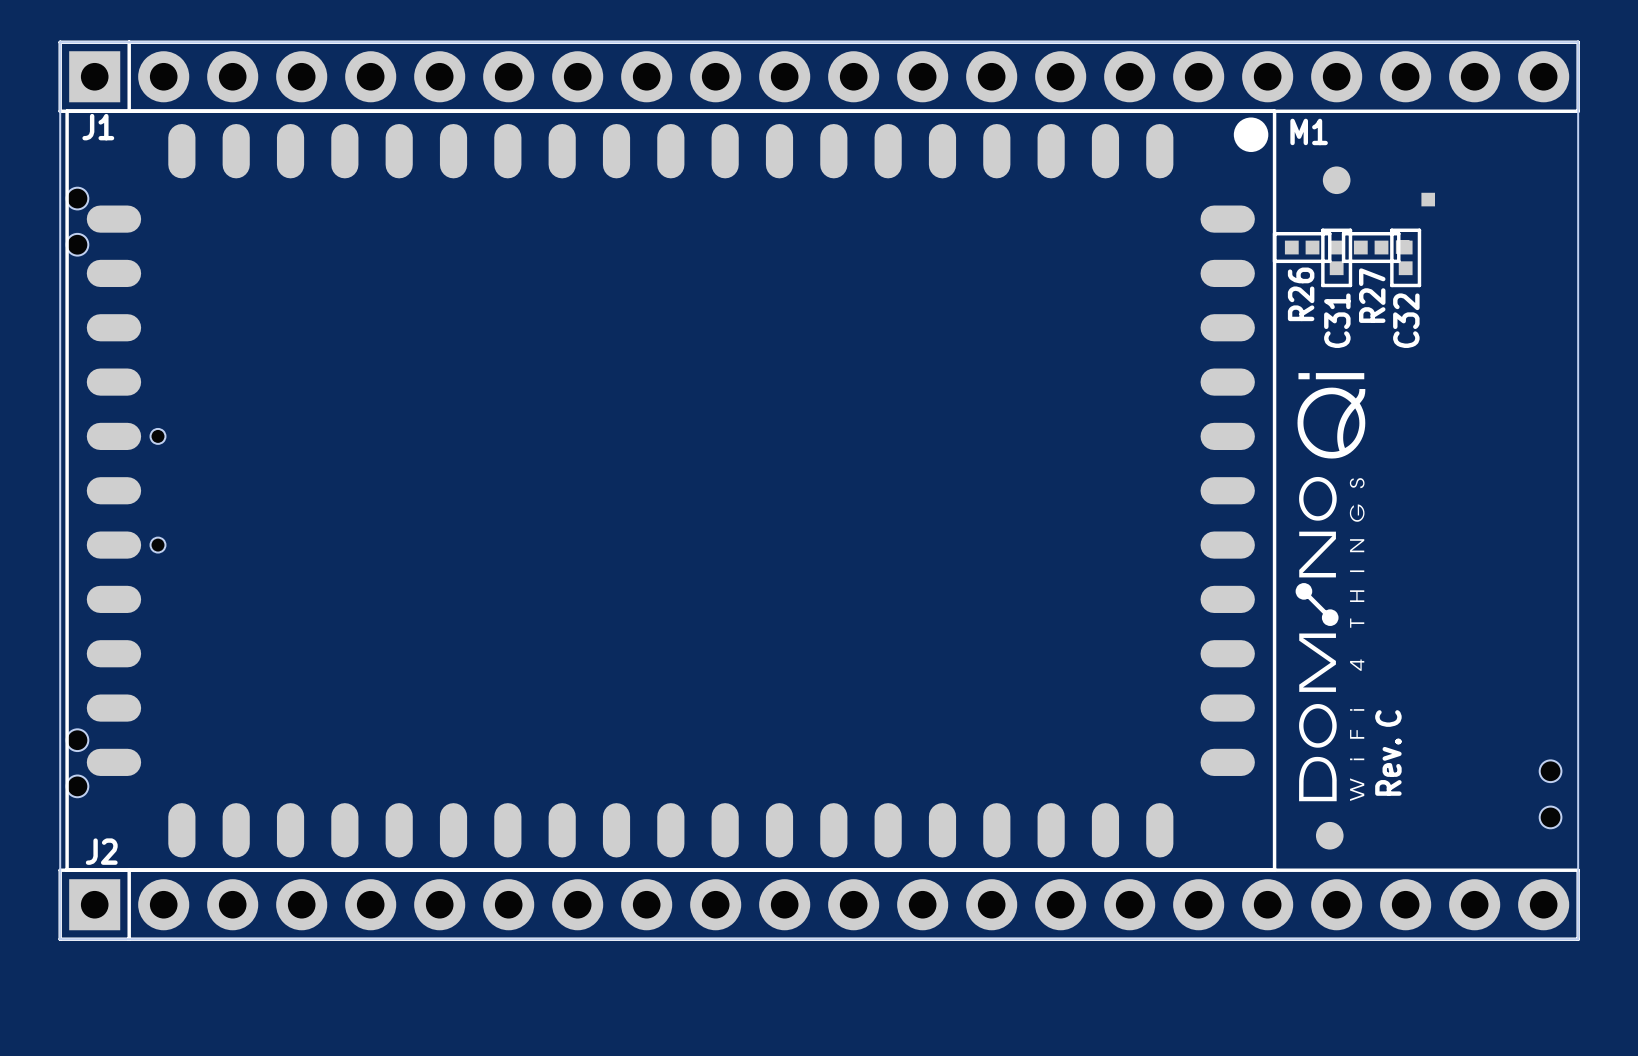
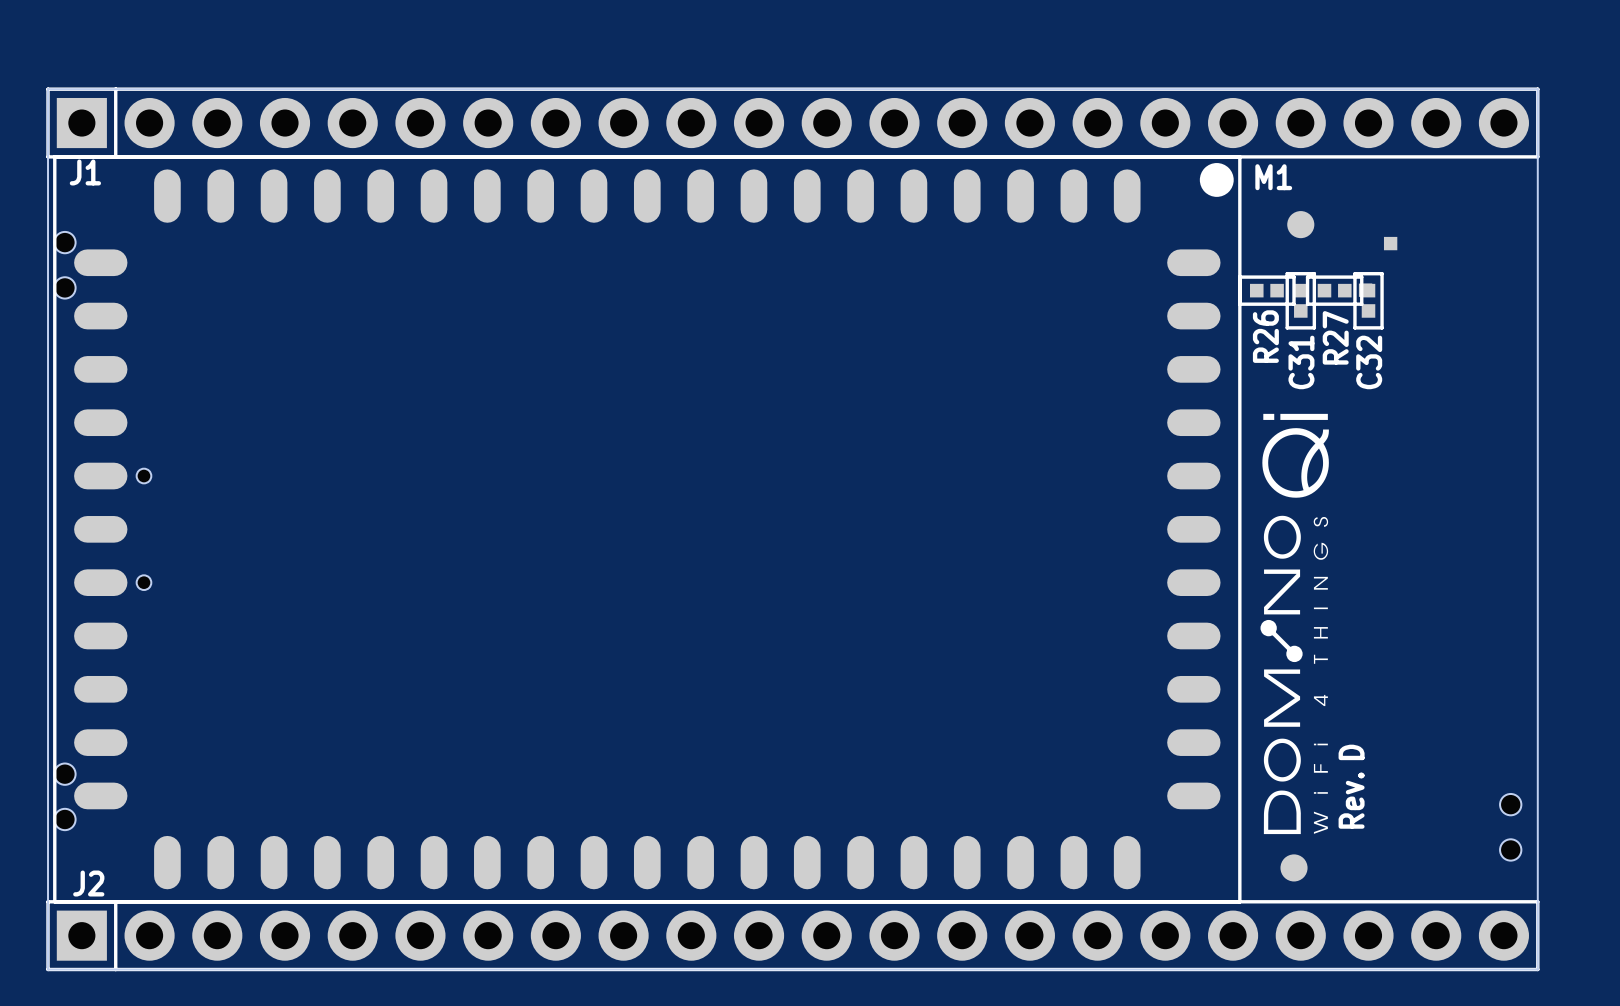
text: C (1388, 718) -> D (1351, 752)

